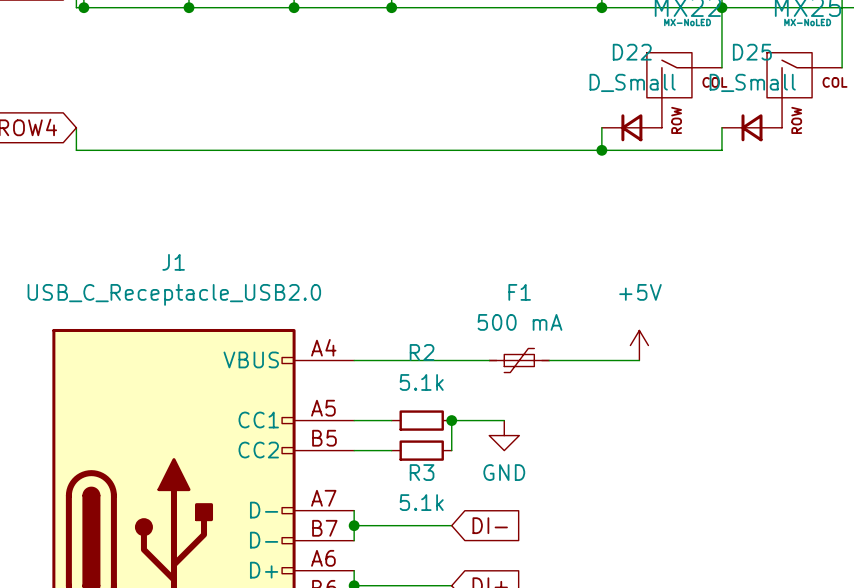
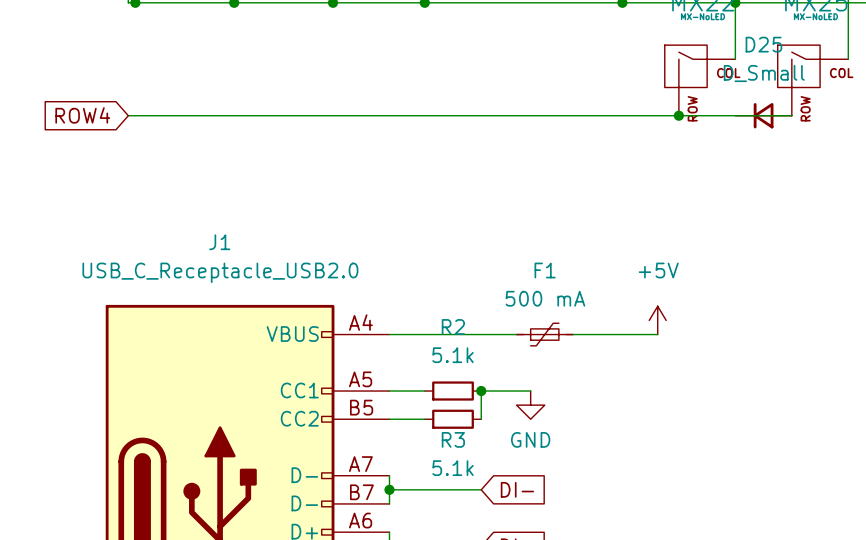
wire: (76, 127) (76, 150) (721, 150) (721, 127) -> (128, 115) (791, 115)
wire: (601, 127) (601, 150) -> none
D22: D_Small (631, 127) -> none
junction position: (601, 150) -> (678, 115)

